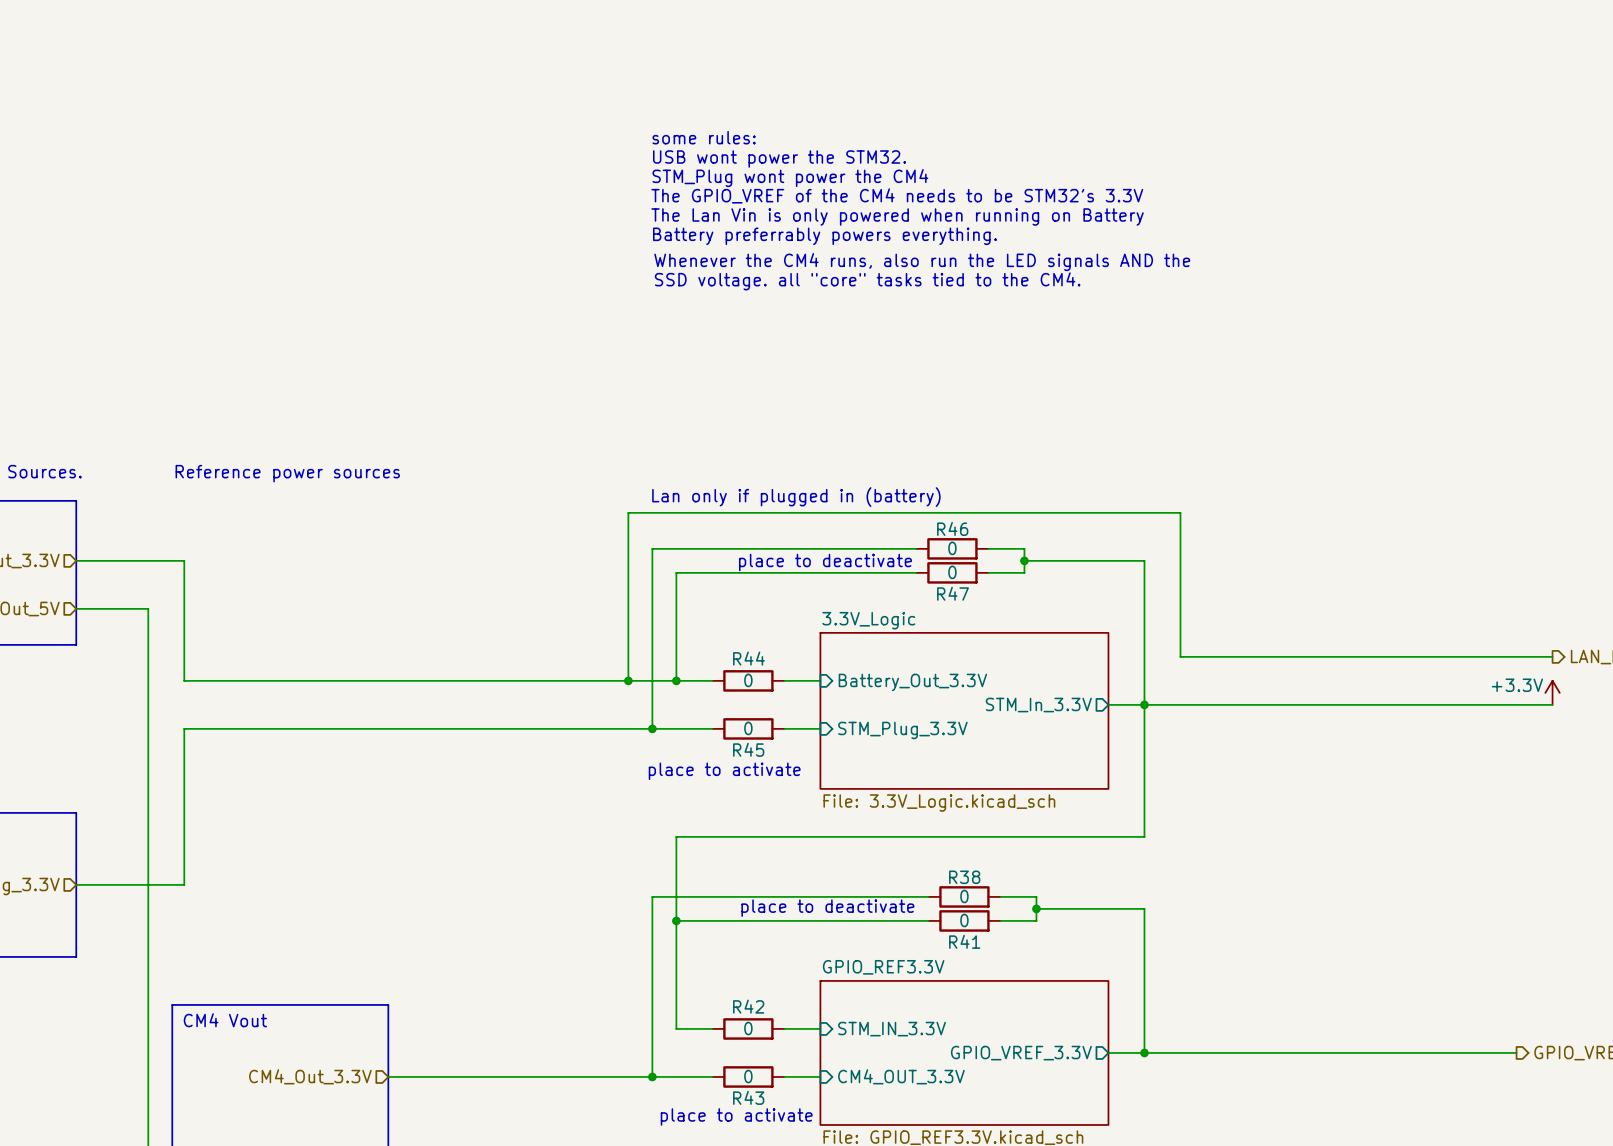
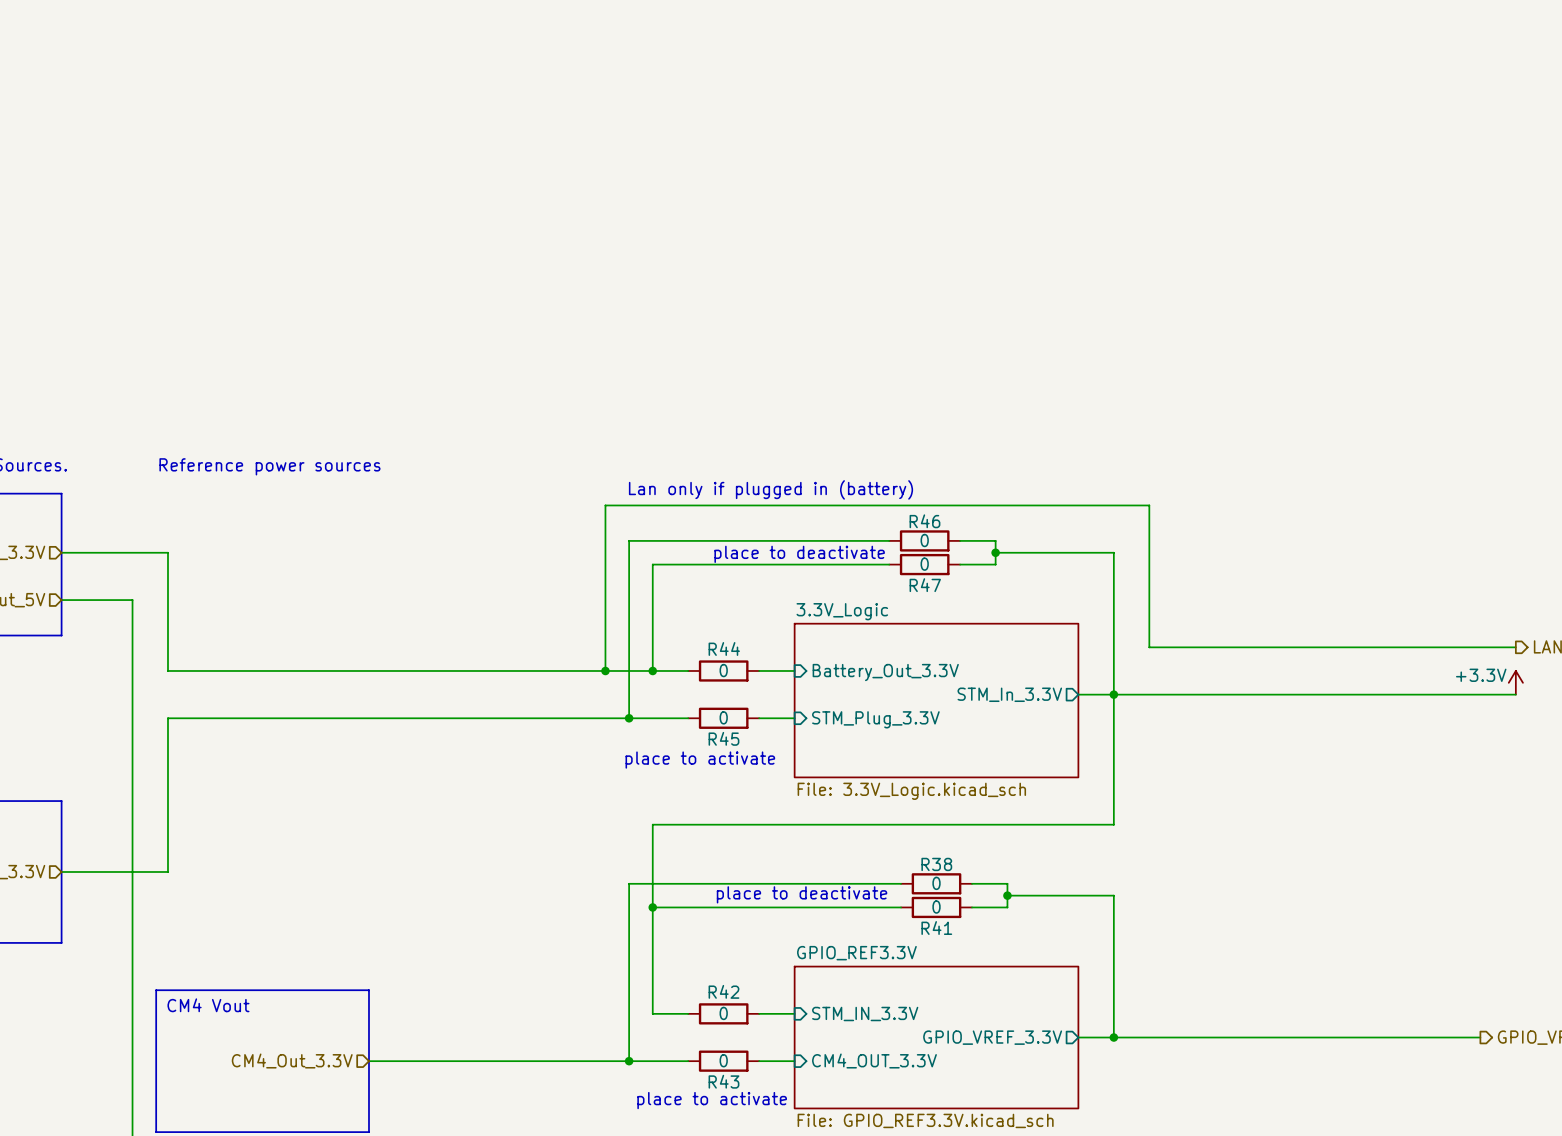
text: some rules: (704, 137) -> none
text: USB wont power the STM32. (779, 159) -> none
text: STM_Plug wont power the CM4 (790, 178) -> none
text: The GPIO_VREF of the CM4 needs to be STM32's 3.3V (897, 195) -> none
text: The Lan Vin is only powered when running on Battery (897, 216) -> none
text: Battery preferrably powers everything. (824, 236) -> none
text: Whenever the CM4 runs, also run the LED signals AND the (922, 262) -> none
text: SSD voltage. all "core" tasks tied to the CM4. (867, 281) -> none

